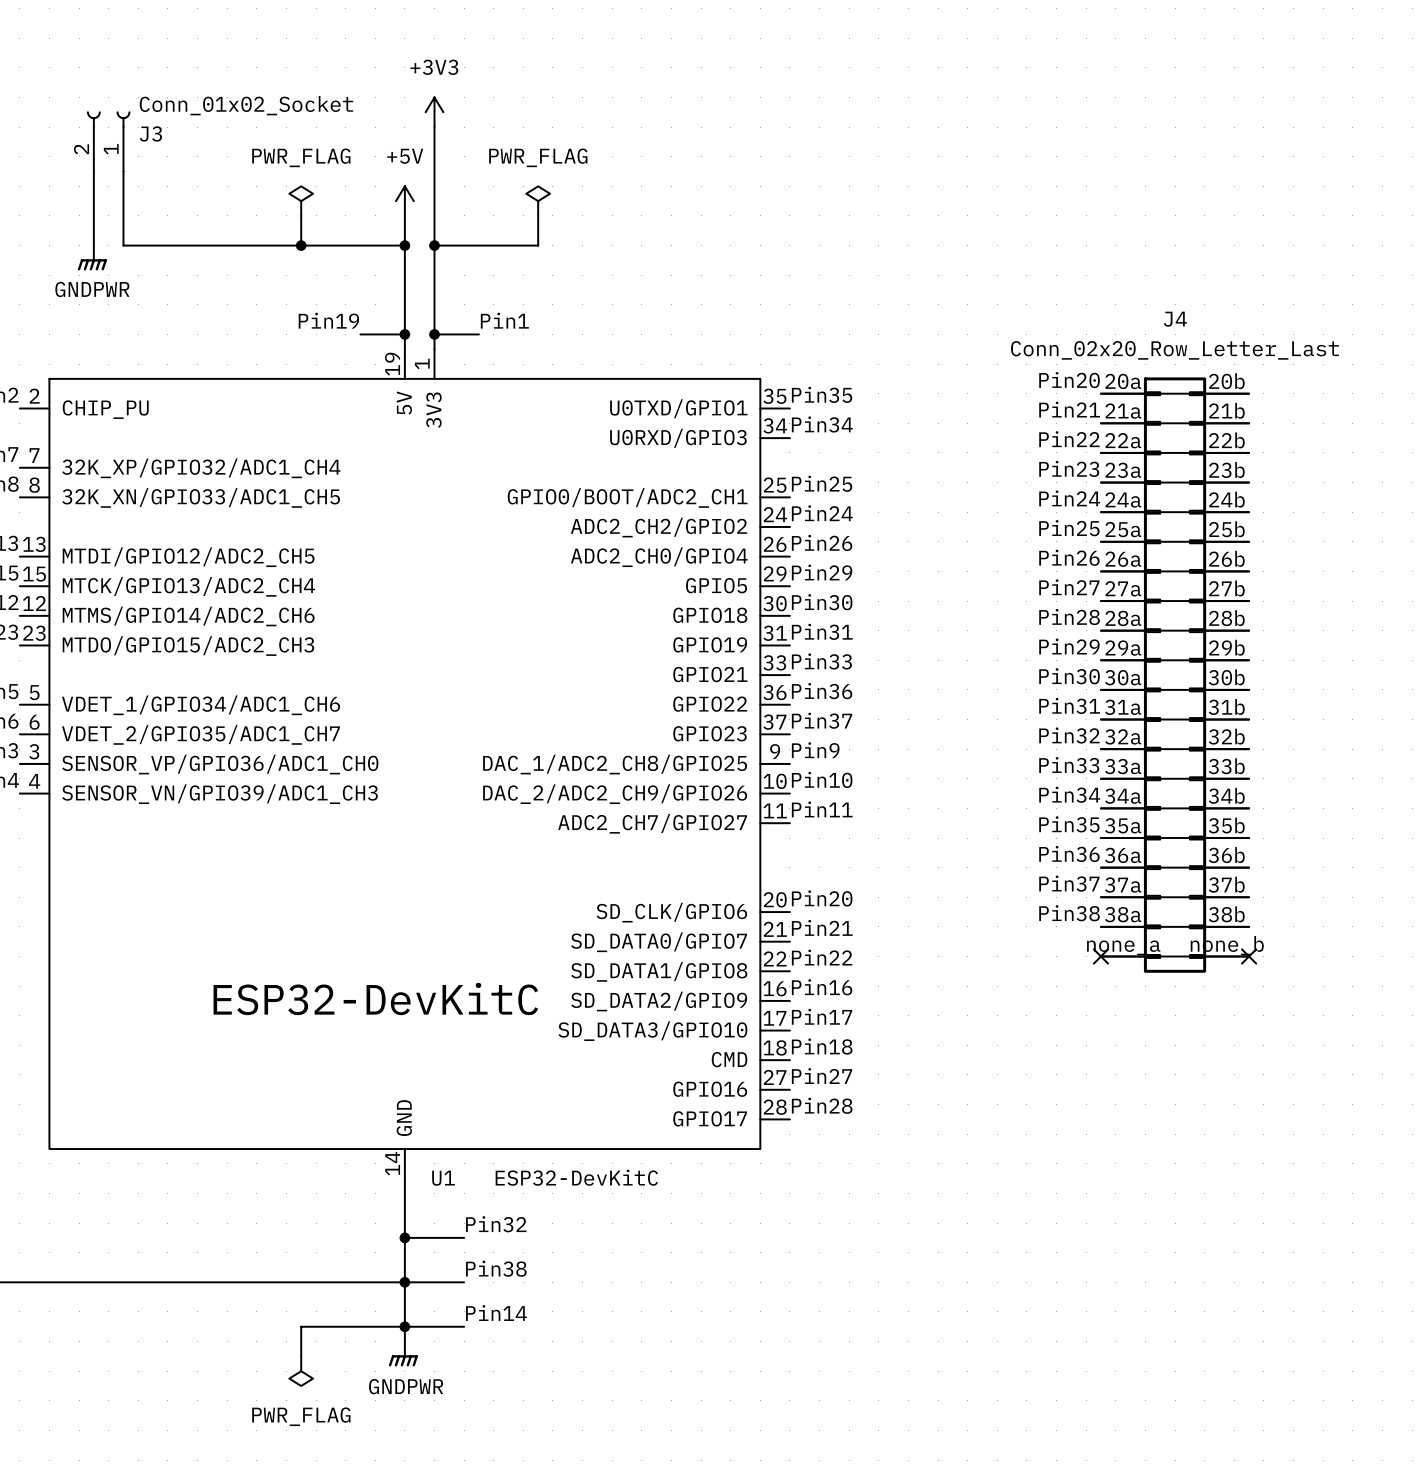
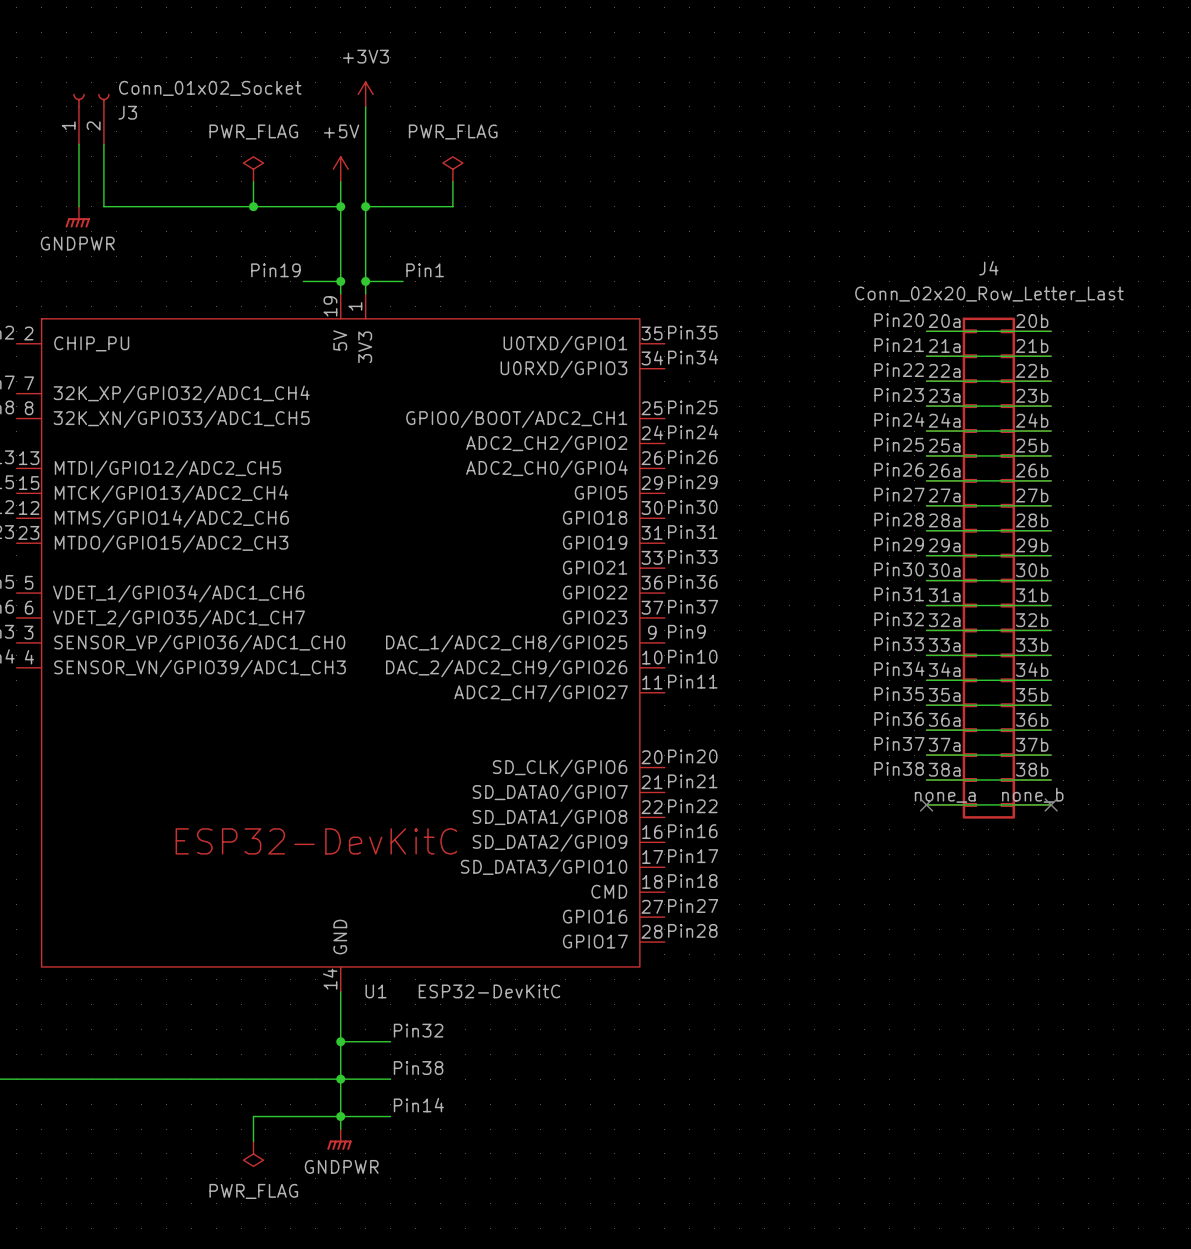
J3 flip: as is (108, 119) -> left-right (91, 100)

